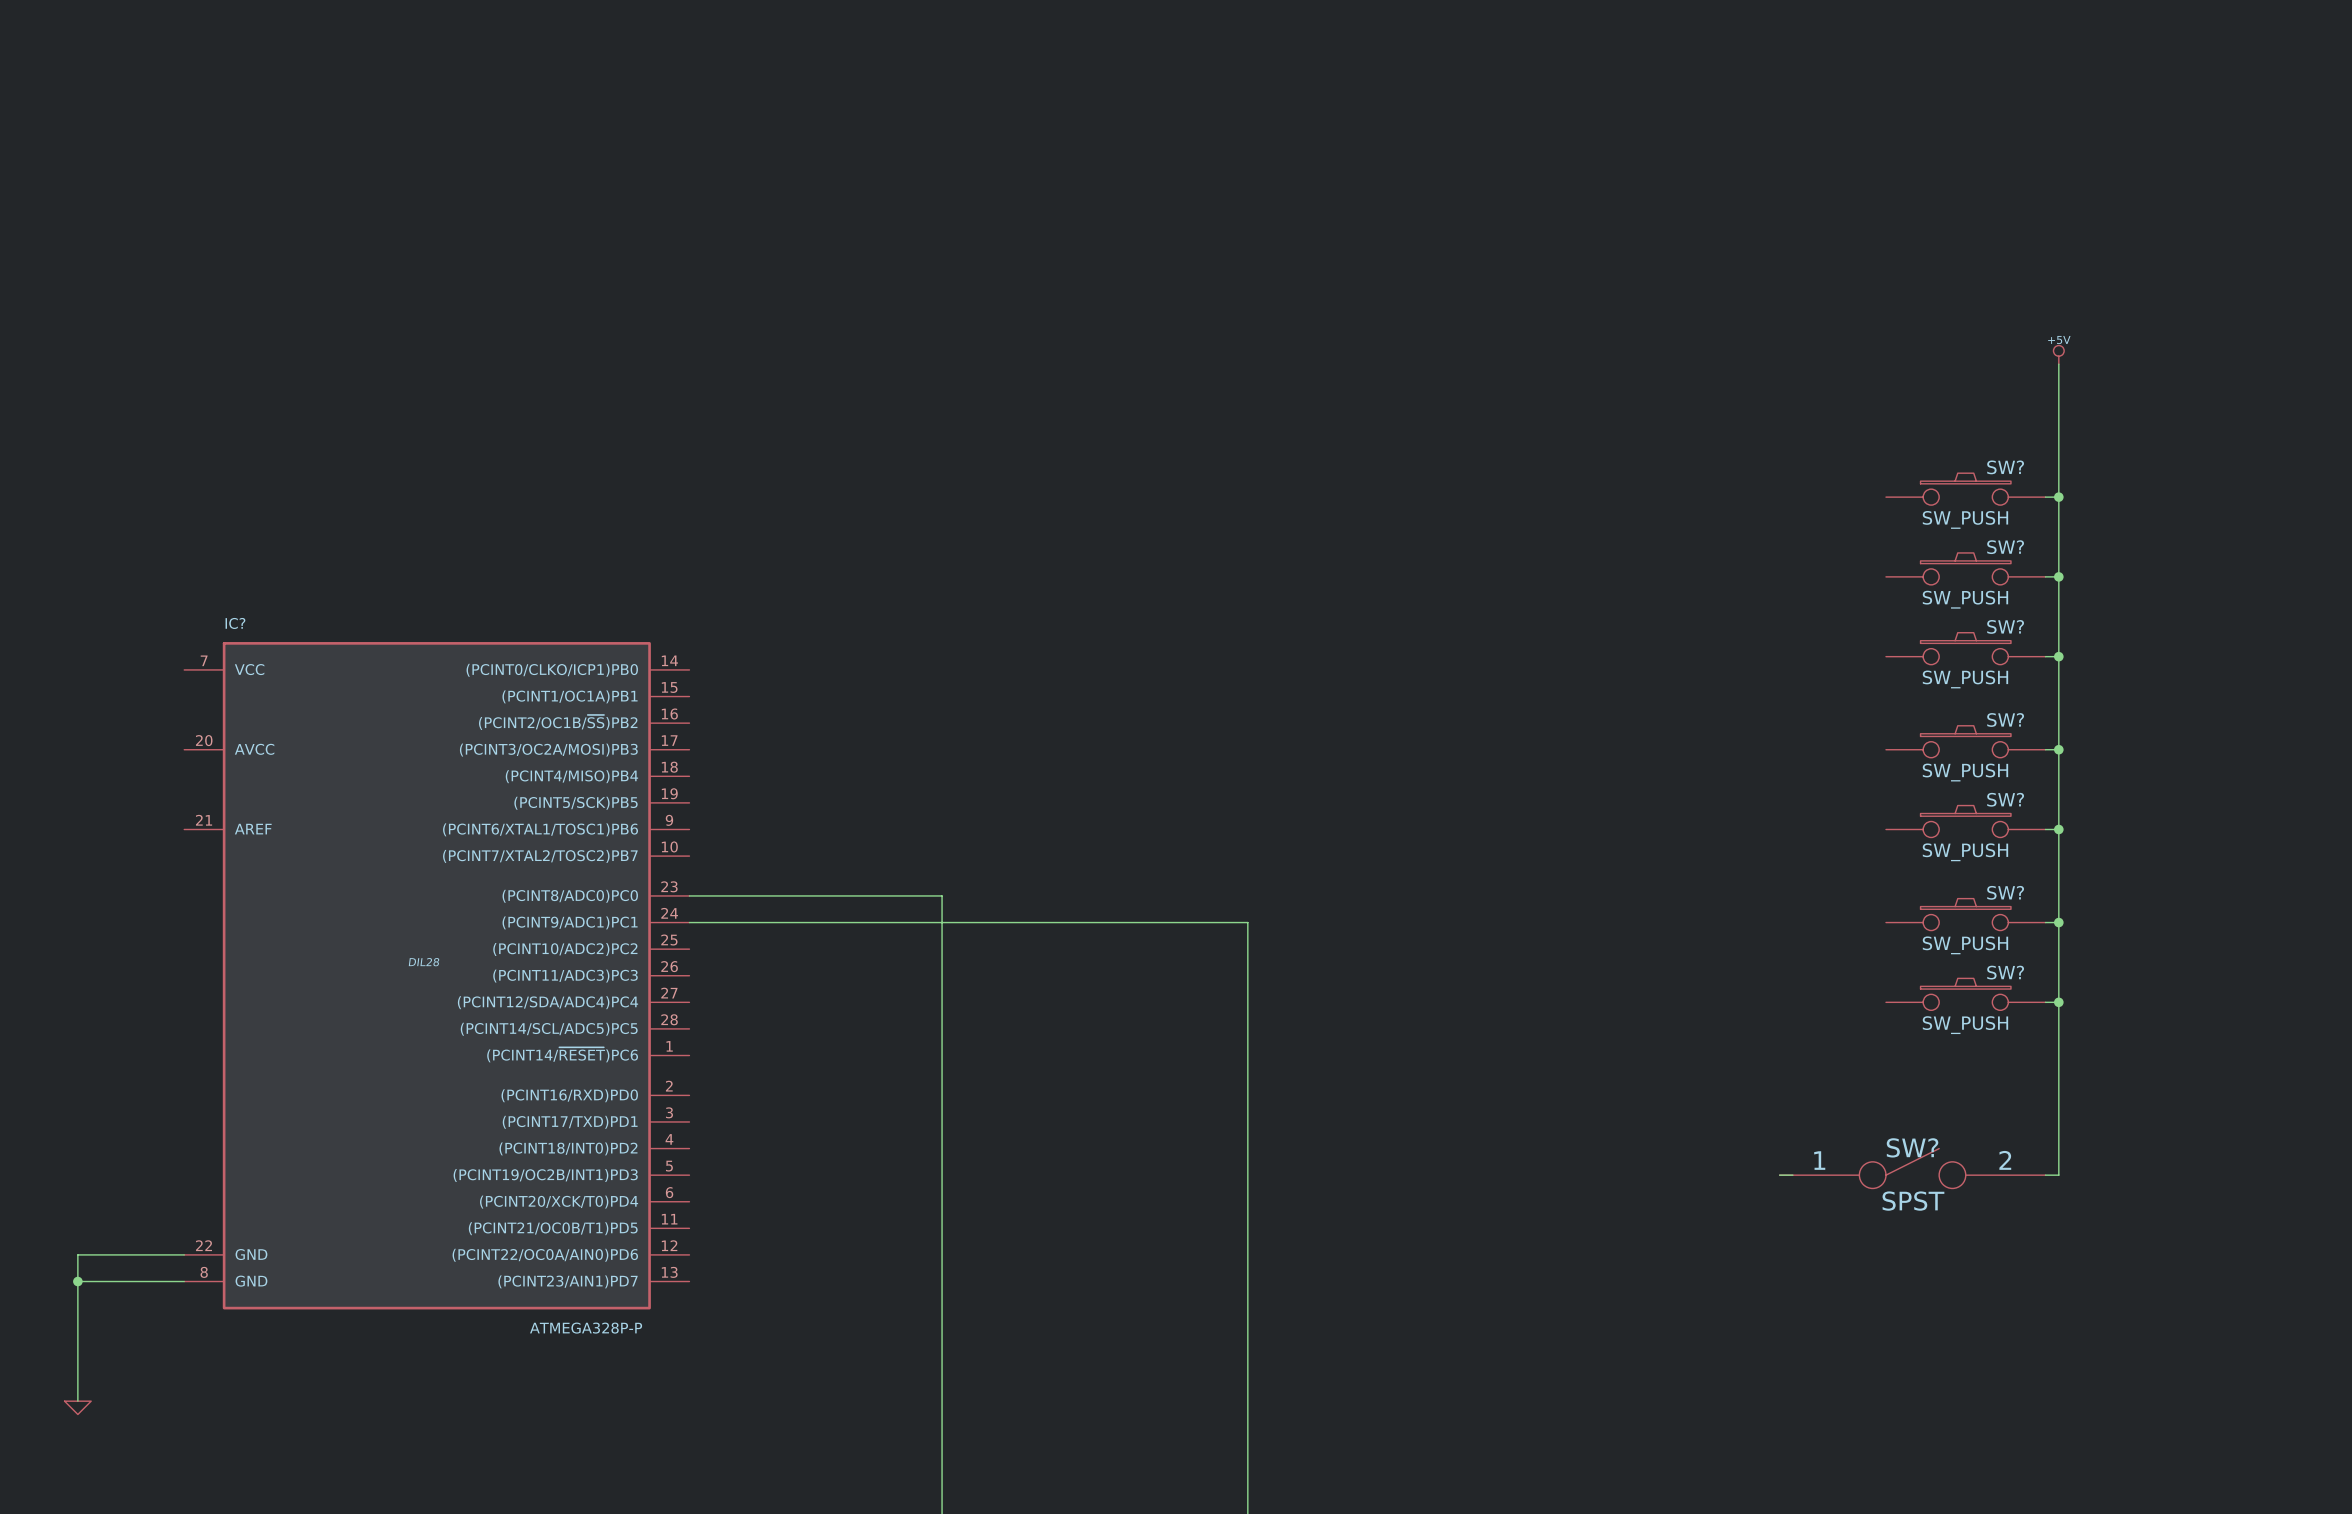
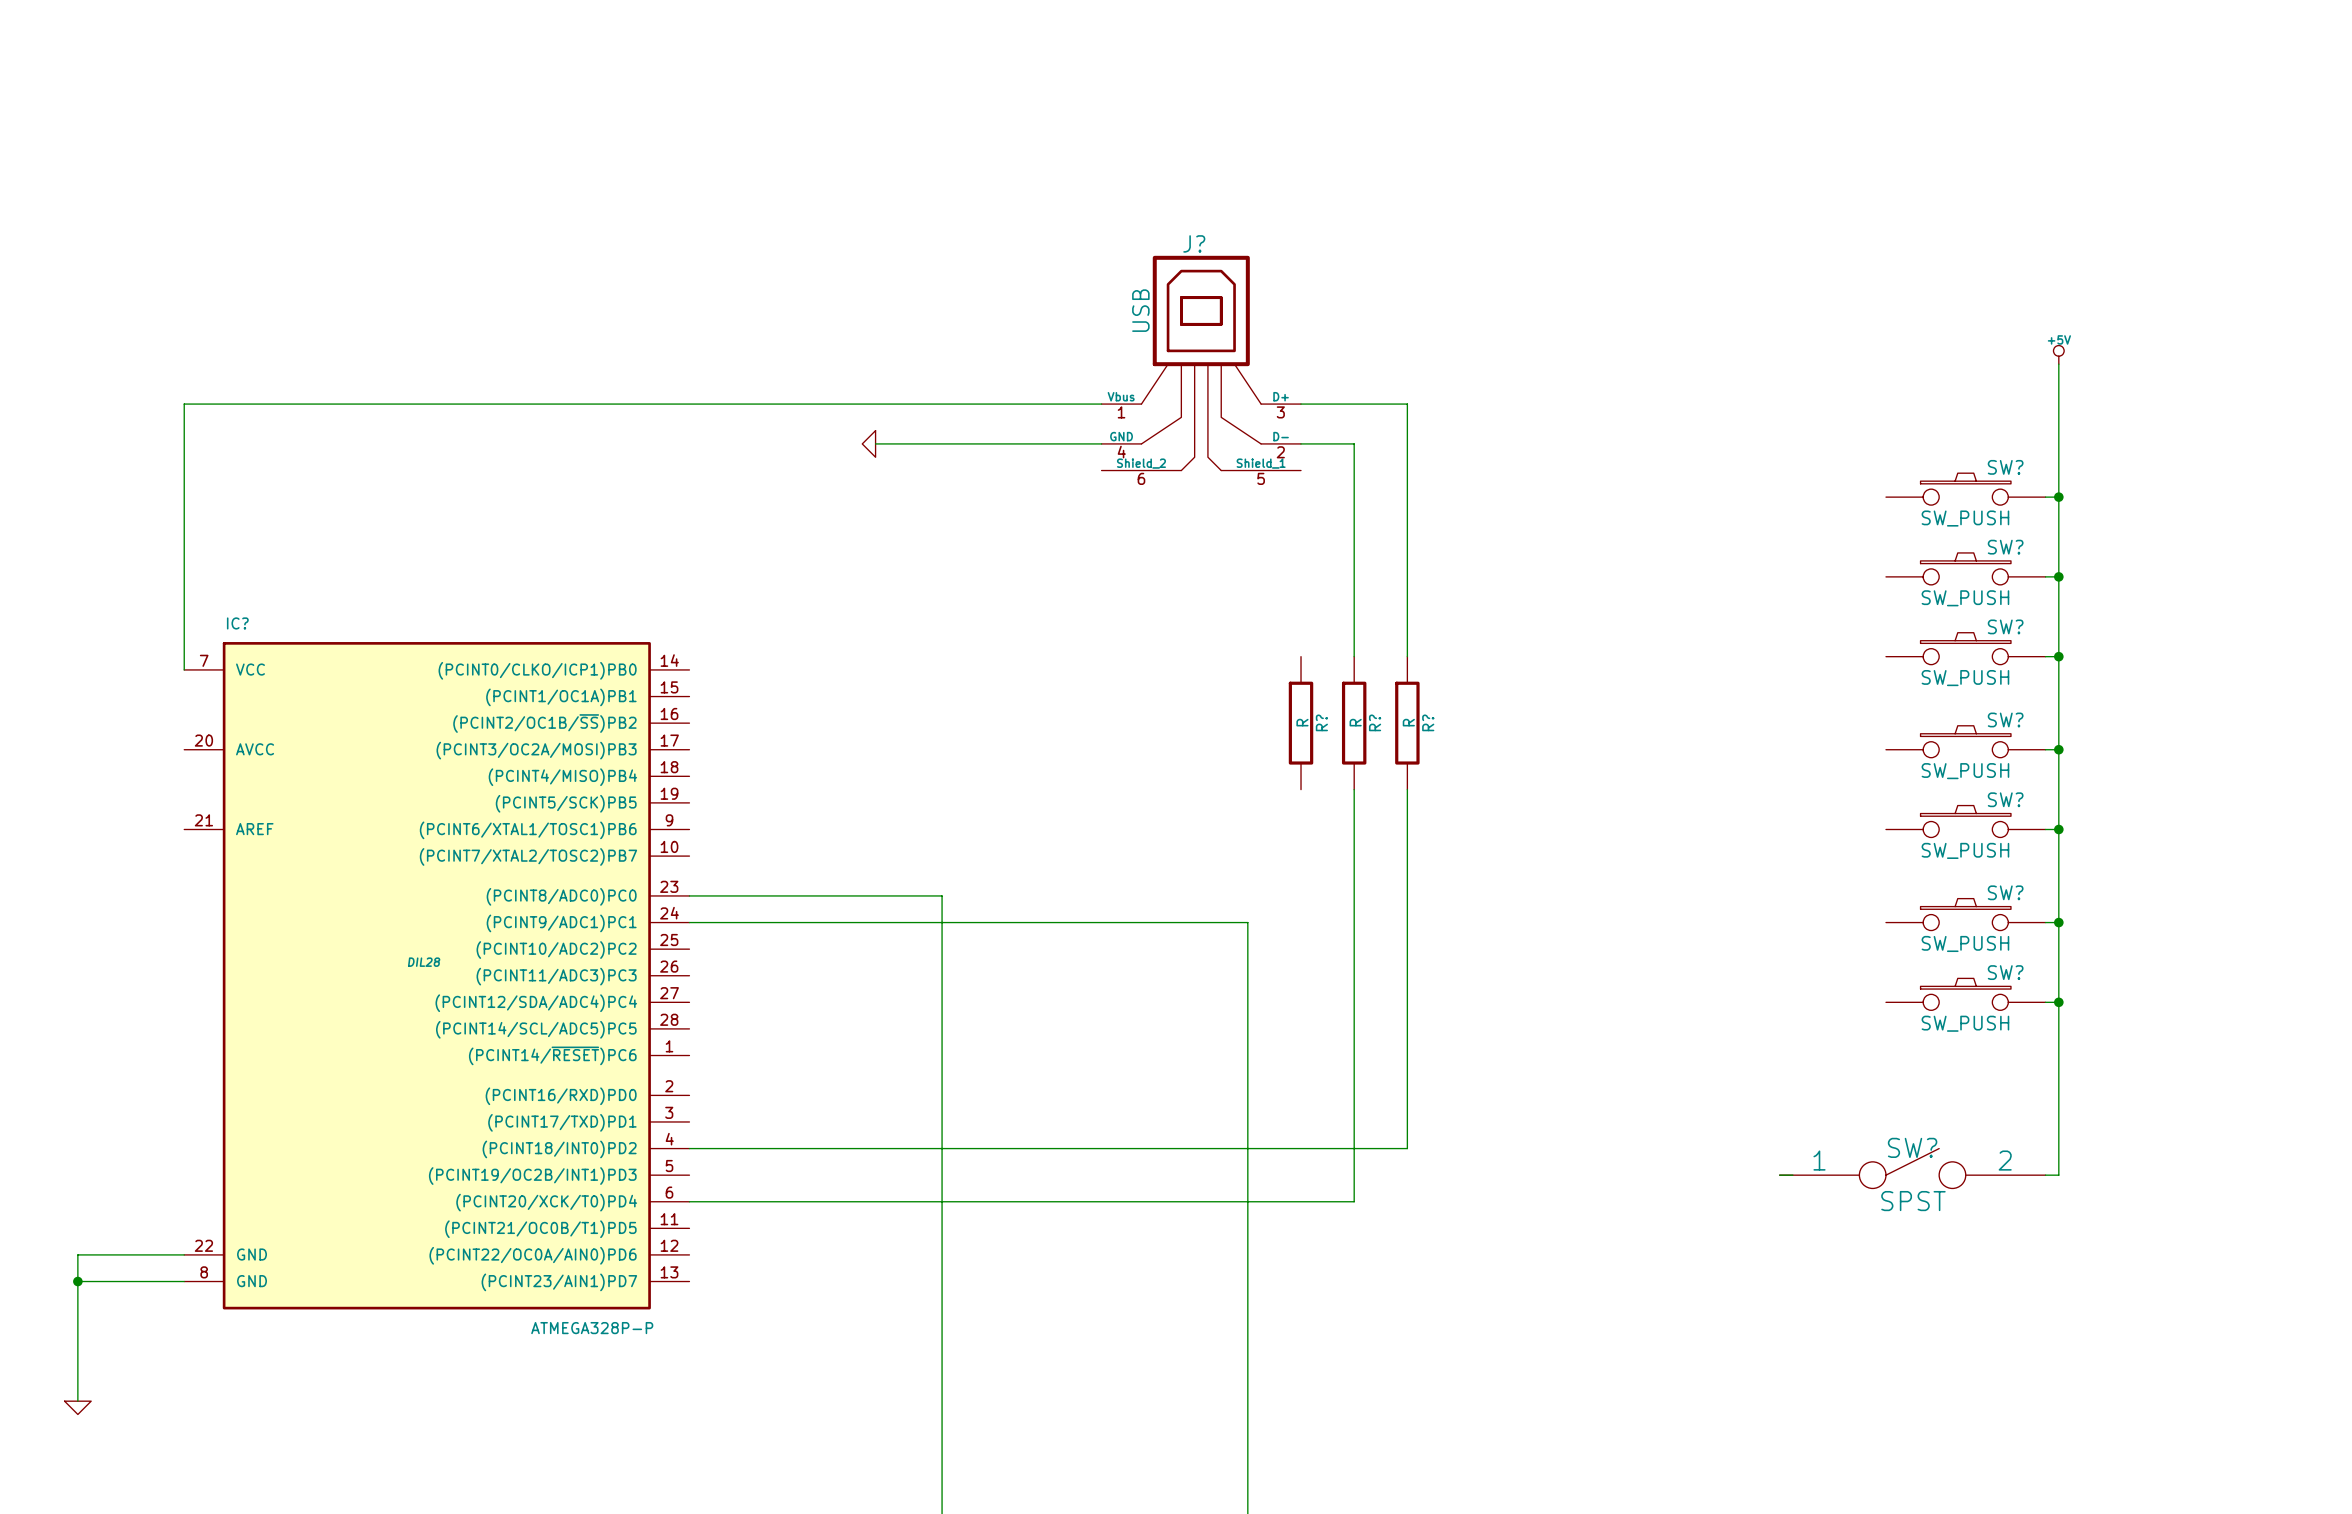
J?: none -> USB (1201, 363)
wire: none -> (1101, 404) (184, 404) (184, 669)
wire: none -> (1301, 404) (1407, 404) (1407, 656)
power symbol: none -> (868, 443)
wire: none -> (875, 443) (1101, 443)
wire: none -> (1301, 443) (1354, 443) (1354, 656)
R?: none -> R (1301, 723)
R?: none -> R (1354, 723)
R?: none -> R (1407, 723)
wire: none -> (1354, 789) (1354, 1201) (689, 1201)
wire: none -> (1407, 789) (1407, 1148) (689, 1148)

